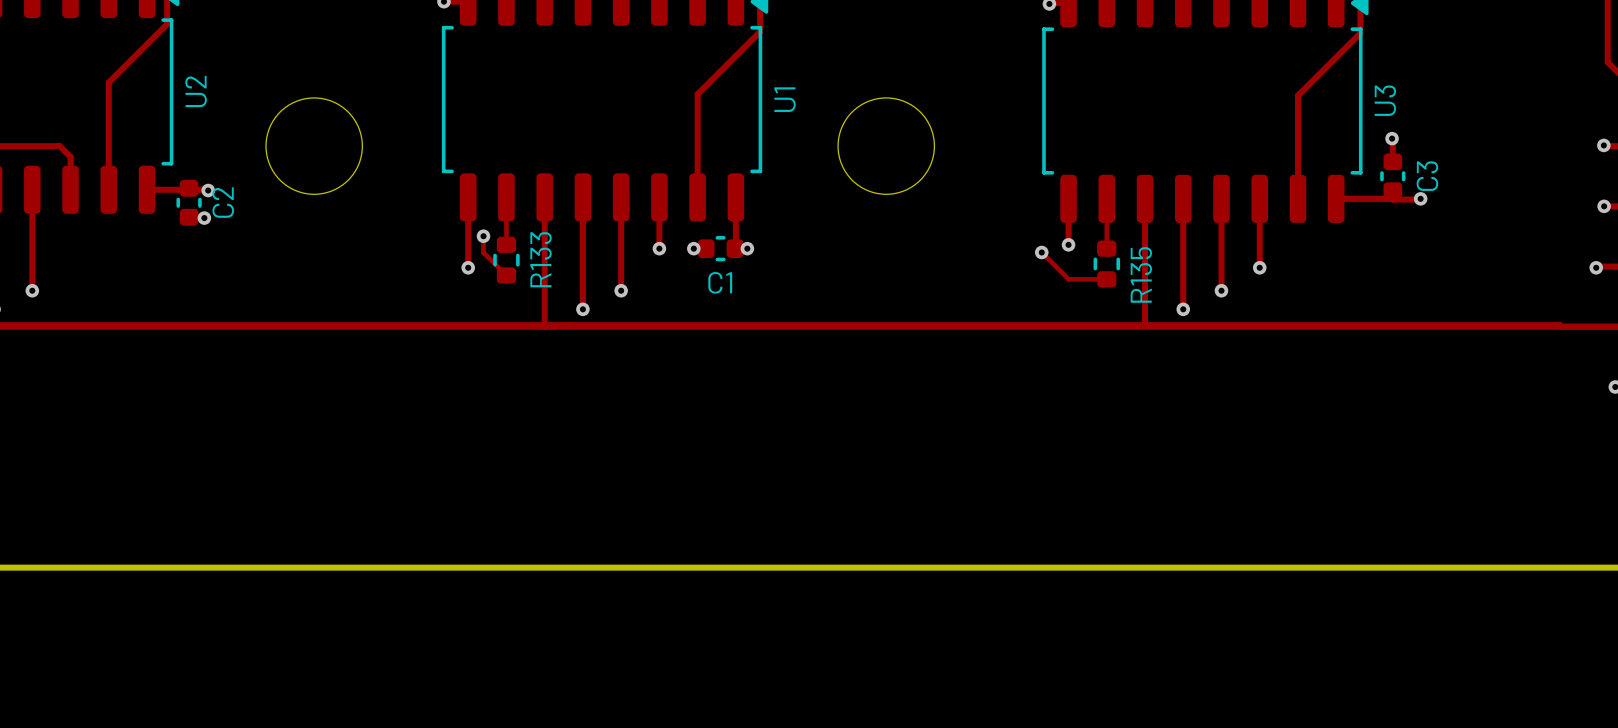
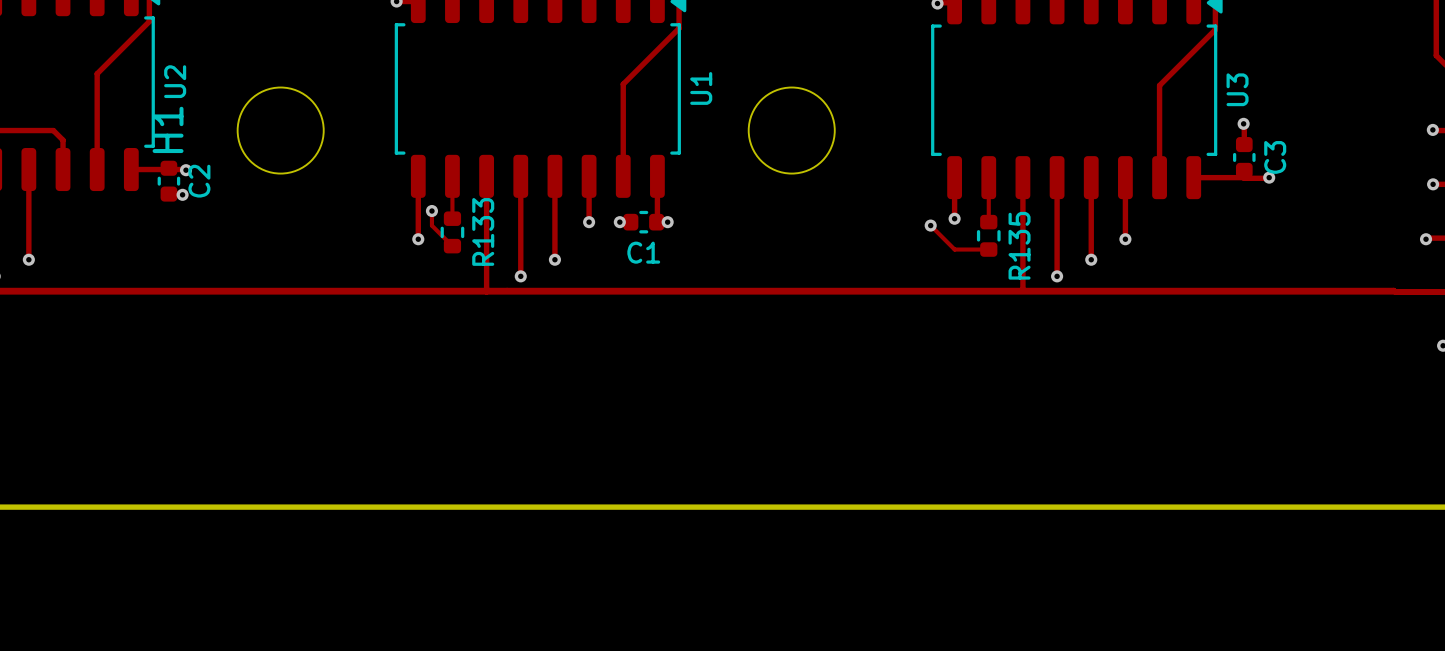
H1 name: none -> H1 (168, 129)

